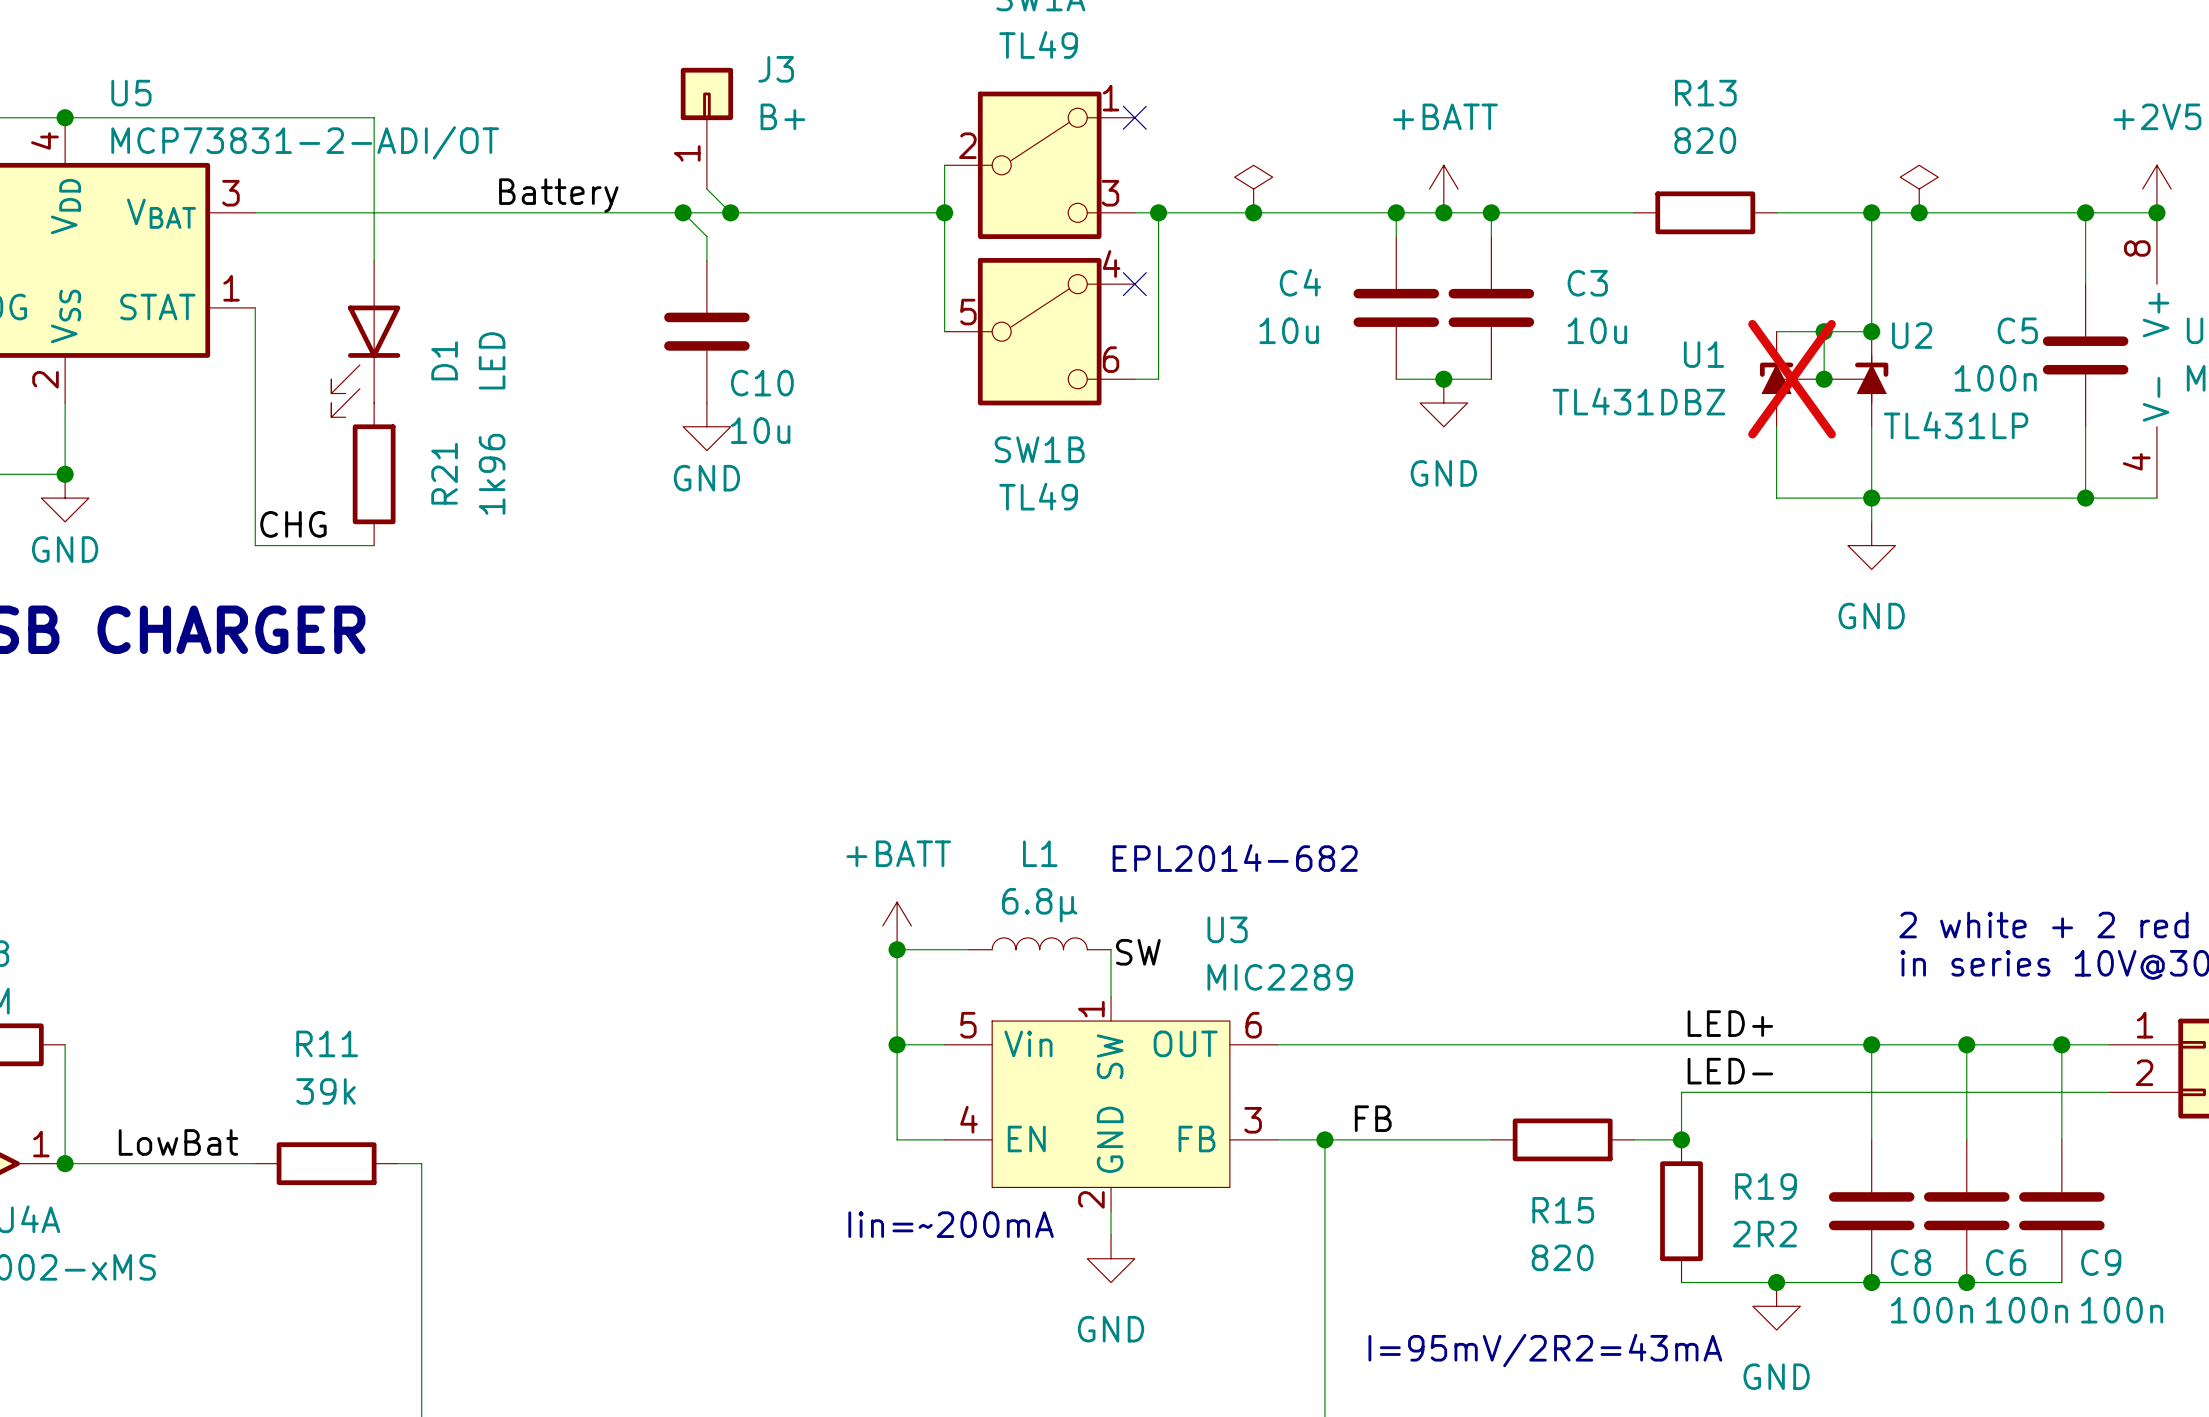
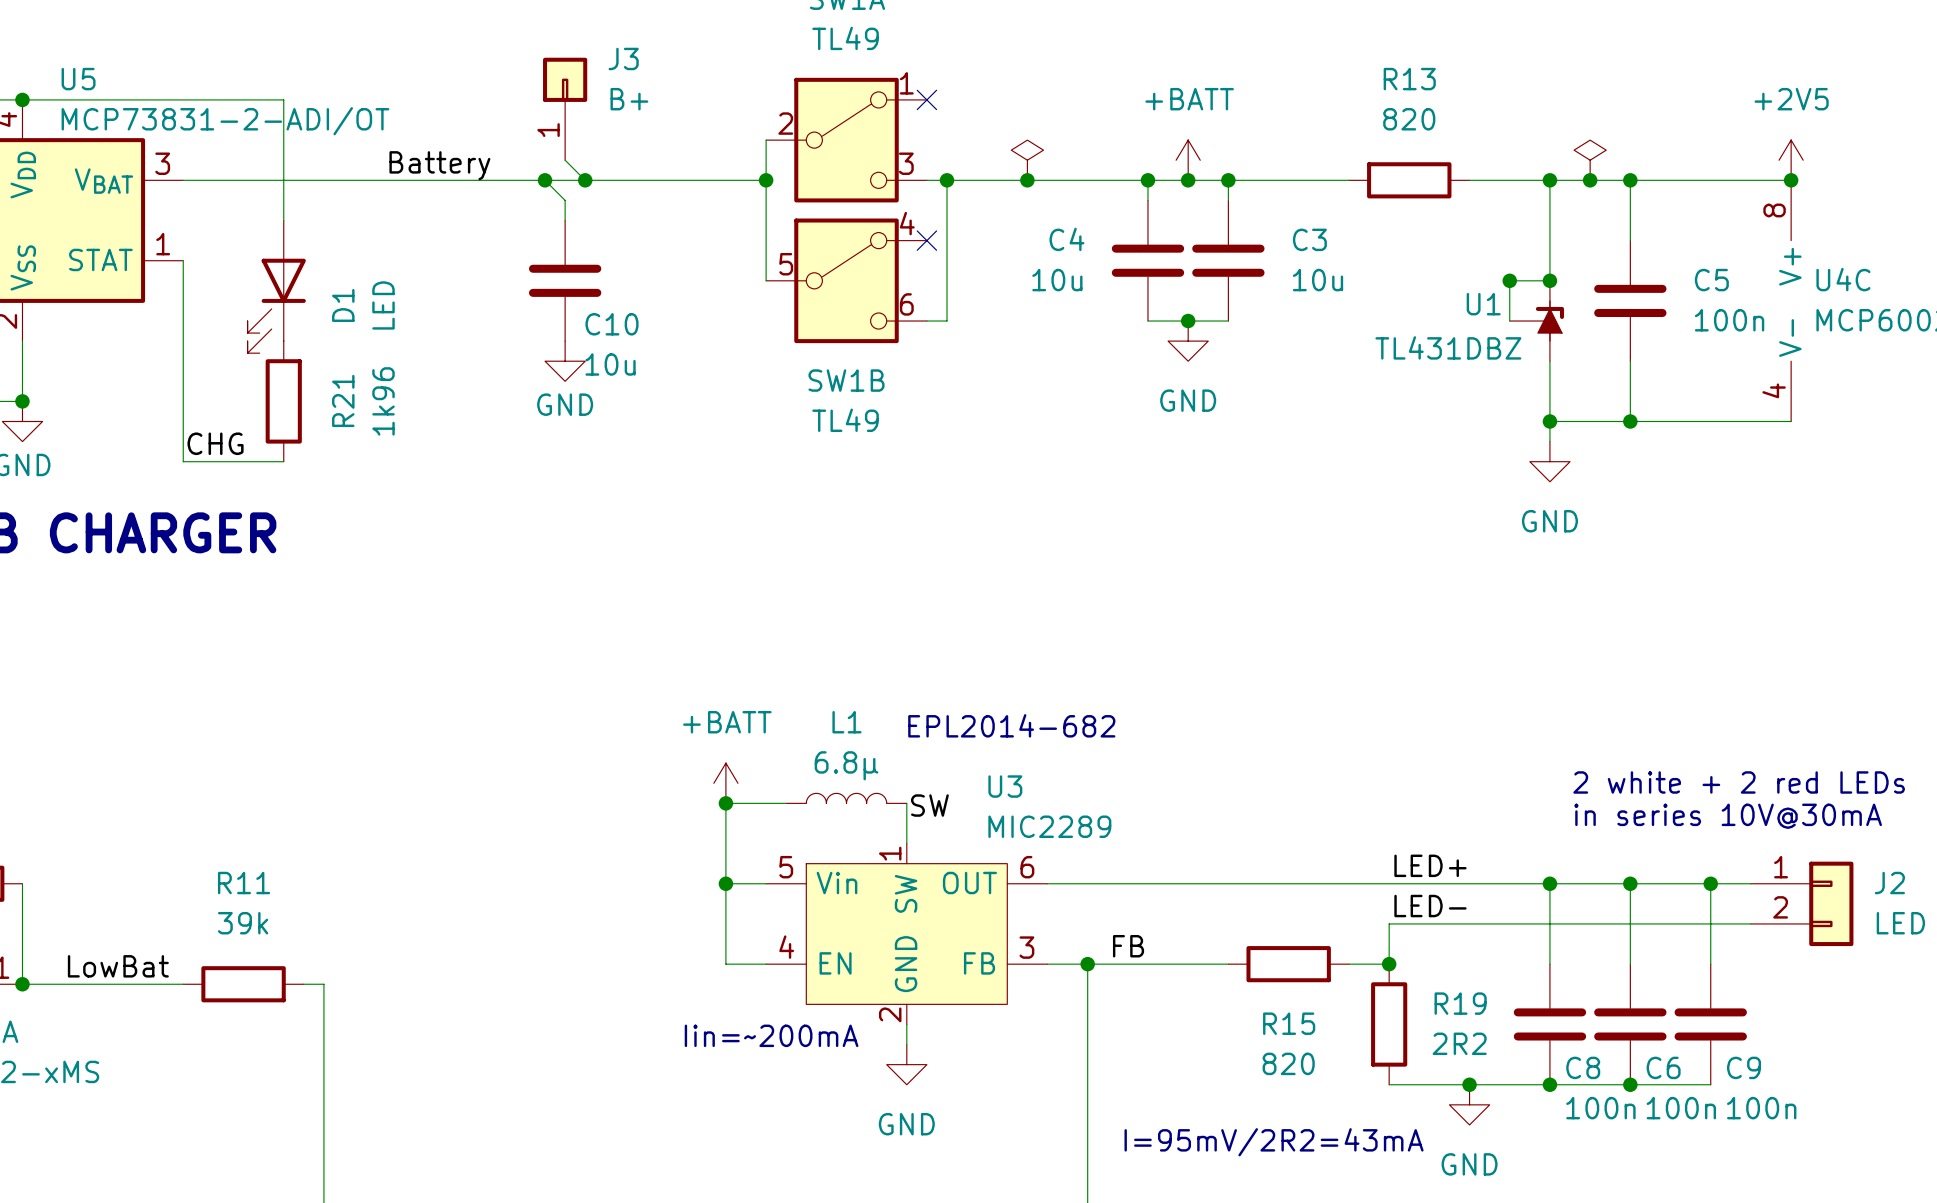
junction: none -> (1630, 180)
wire: (2085, 212) (2085, 284) -> (1630, 180) (1630, 240)
junction: (2085, 212) -> none
C5 name position: C5 (2017, 330) -> C5 (1711, 280)
wire: (1776, 331) (1824, 331) -> none
U2 name: U2 (1912, 335) -> U1 (1483, 304)
C5 position: (2085, 355) -> (1630, 300)
C5 value position: 100n (1995, 378) -> 100n (1729, 320)
U1: TL431DBZ (1792, 379) -> none
junction: (1824, 379) -> none
U2 value: TL431LP (1956, 425) -> TL431DBZ (1448, 347)
wire: (1776, 426) (1776, 498) (1871, 498) -> none
wire: (2085, 426) (2085, 498) -> (1630, 361) (1630, 421)
junction: none -> (1630, 421)
junction: (2085, 498) -> none

